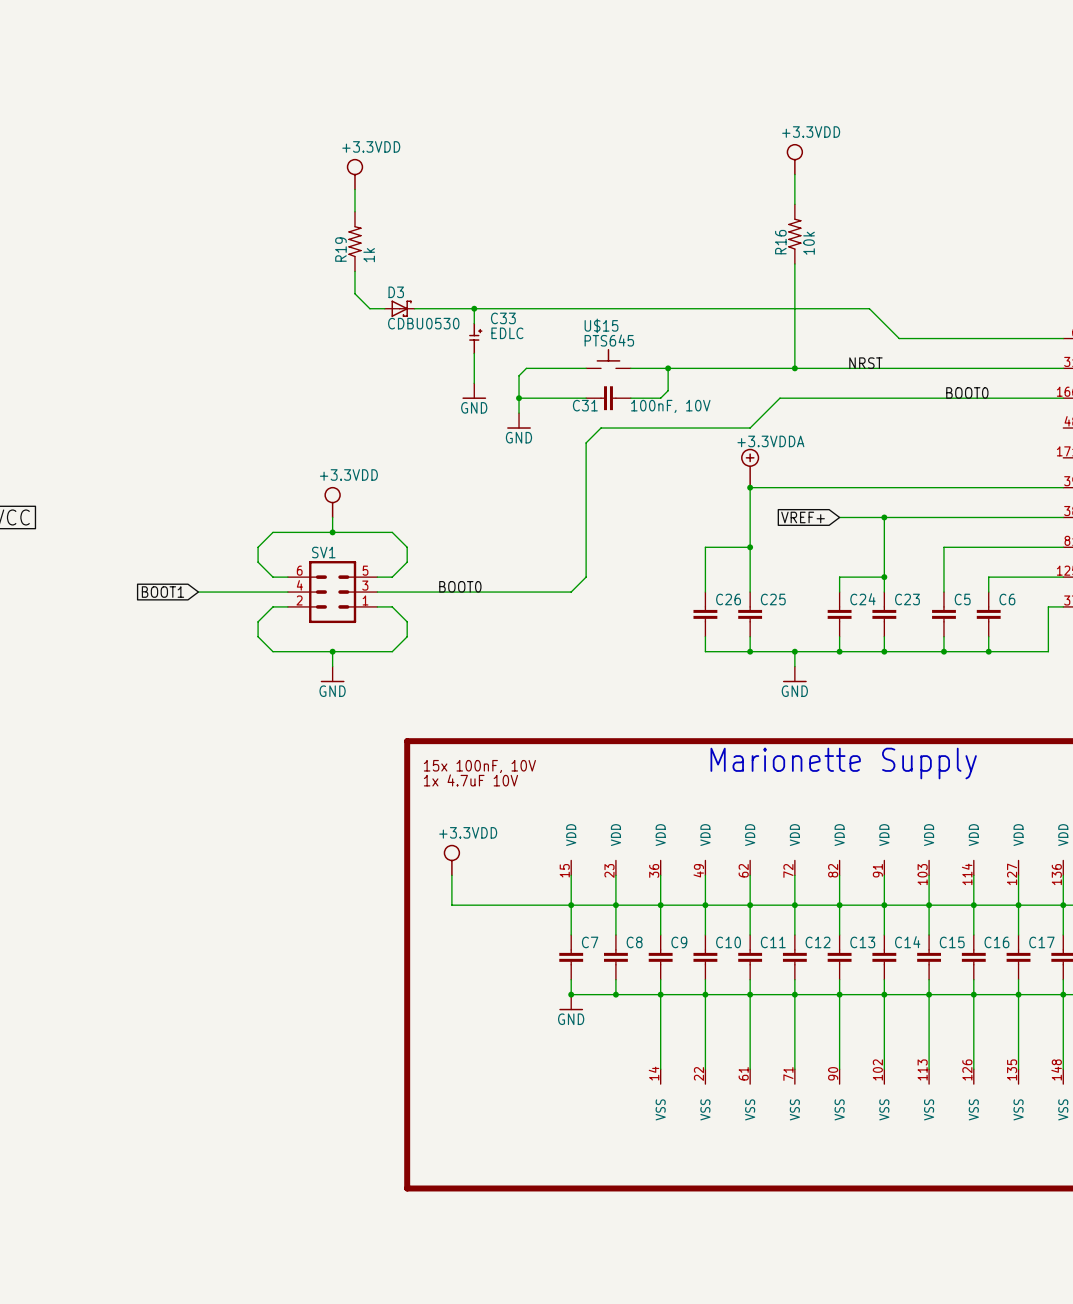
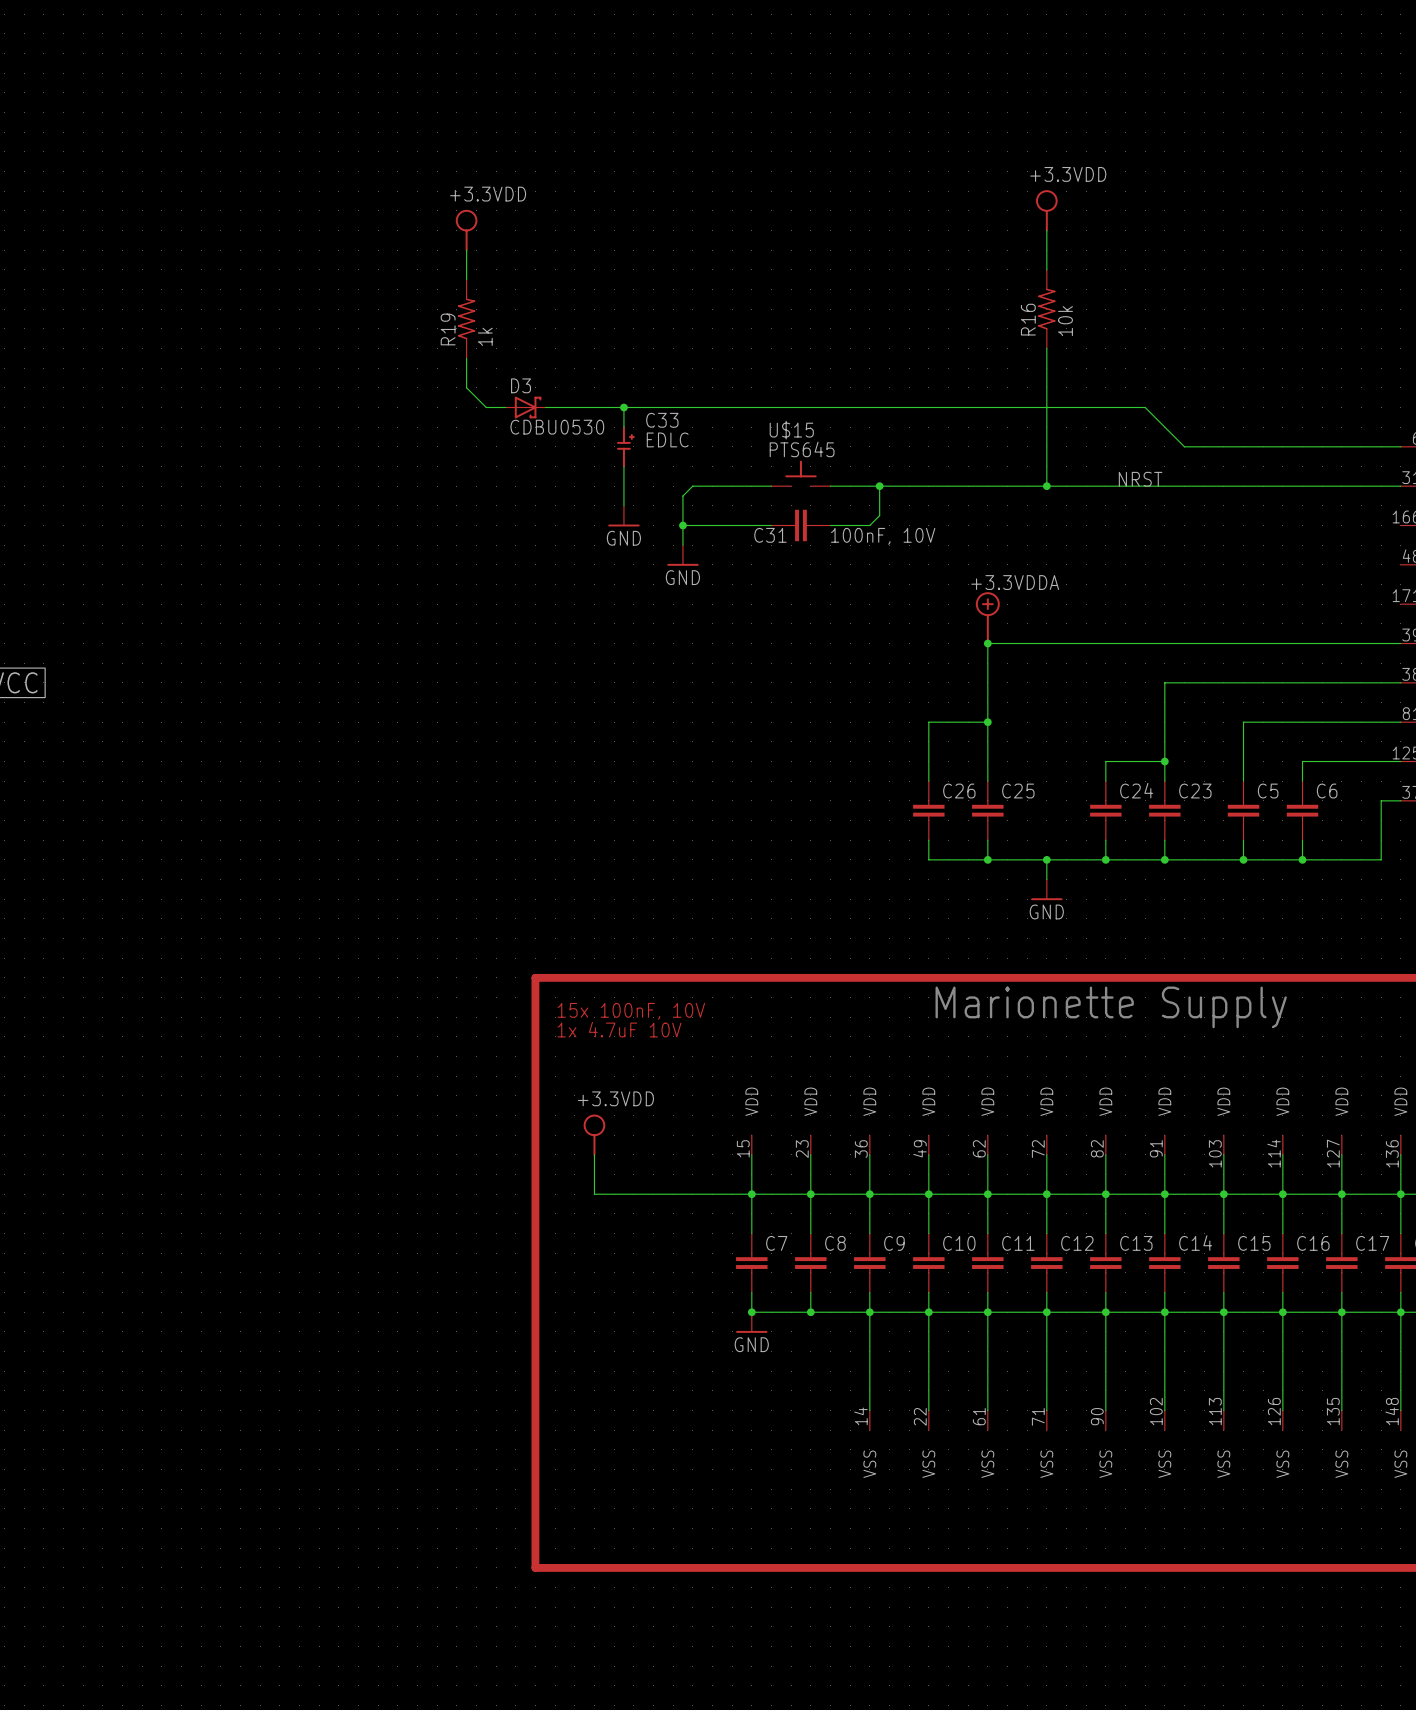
label: BOOT0 (967, 392) -> none
wire: (1063, 398) (779, 398) (750, 428) (601, 428) (586, 442) (586, 577) (571, 592) (377, 592) -> none
power symbol: +3.3VDD (332, 502) -> none
wire: (332, 517) (332, 532) -> none
global label: VREF+ (803, 517) -> none
wire: (839, 517) (884, 517) -> none
junction: (884, 517) -> none
junction: (332, 532) -> none
wire: (287, 577) (272, 577) (258, 562) (258, 547) (272, 532) (392, 532) (407, 547) (407, 562) (392, 577) (377, 577) -> none
label: BOOT0 (460, 586) -> none
global label: BOOT1 (162, 592) -> none
wire: (198, 592) (287, 592) -> none
SV1: (332, 592) -> none
wire: (287, 606) (272, 606) (258, 621) (258, 636) (272, 651) (392, 651) (407, 636) (407, 621) (392, 606) (377, 606) -> none
wire: (332, 651) (332, 666) -> none
junction: (332, 651) -> none
power symbol: GND (332, 674) -> none

